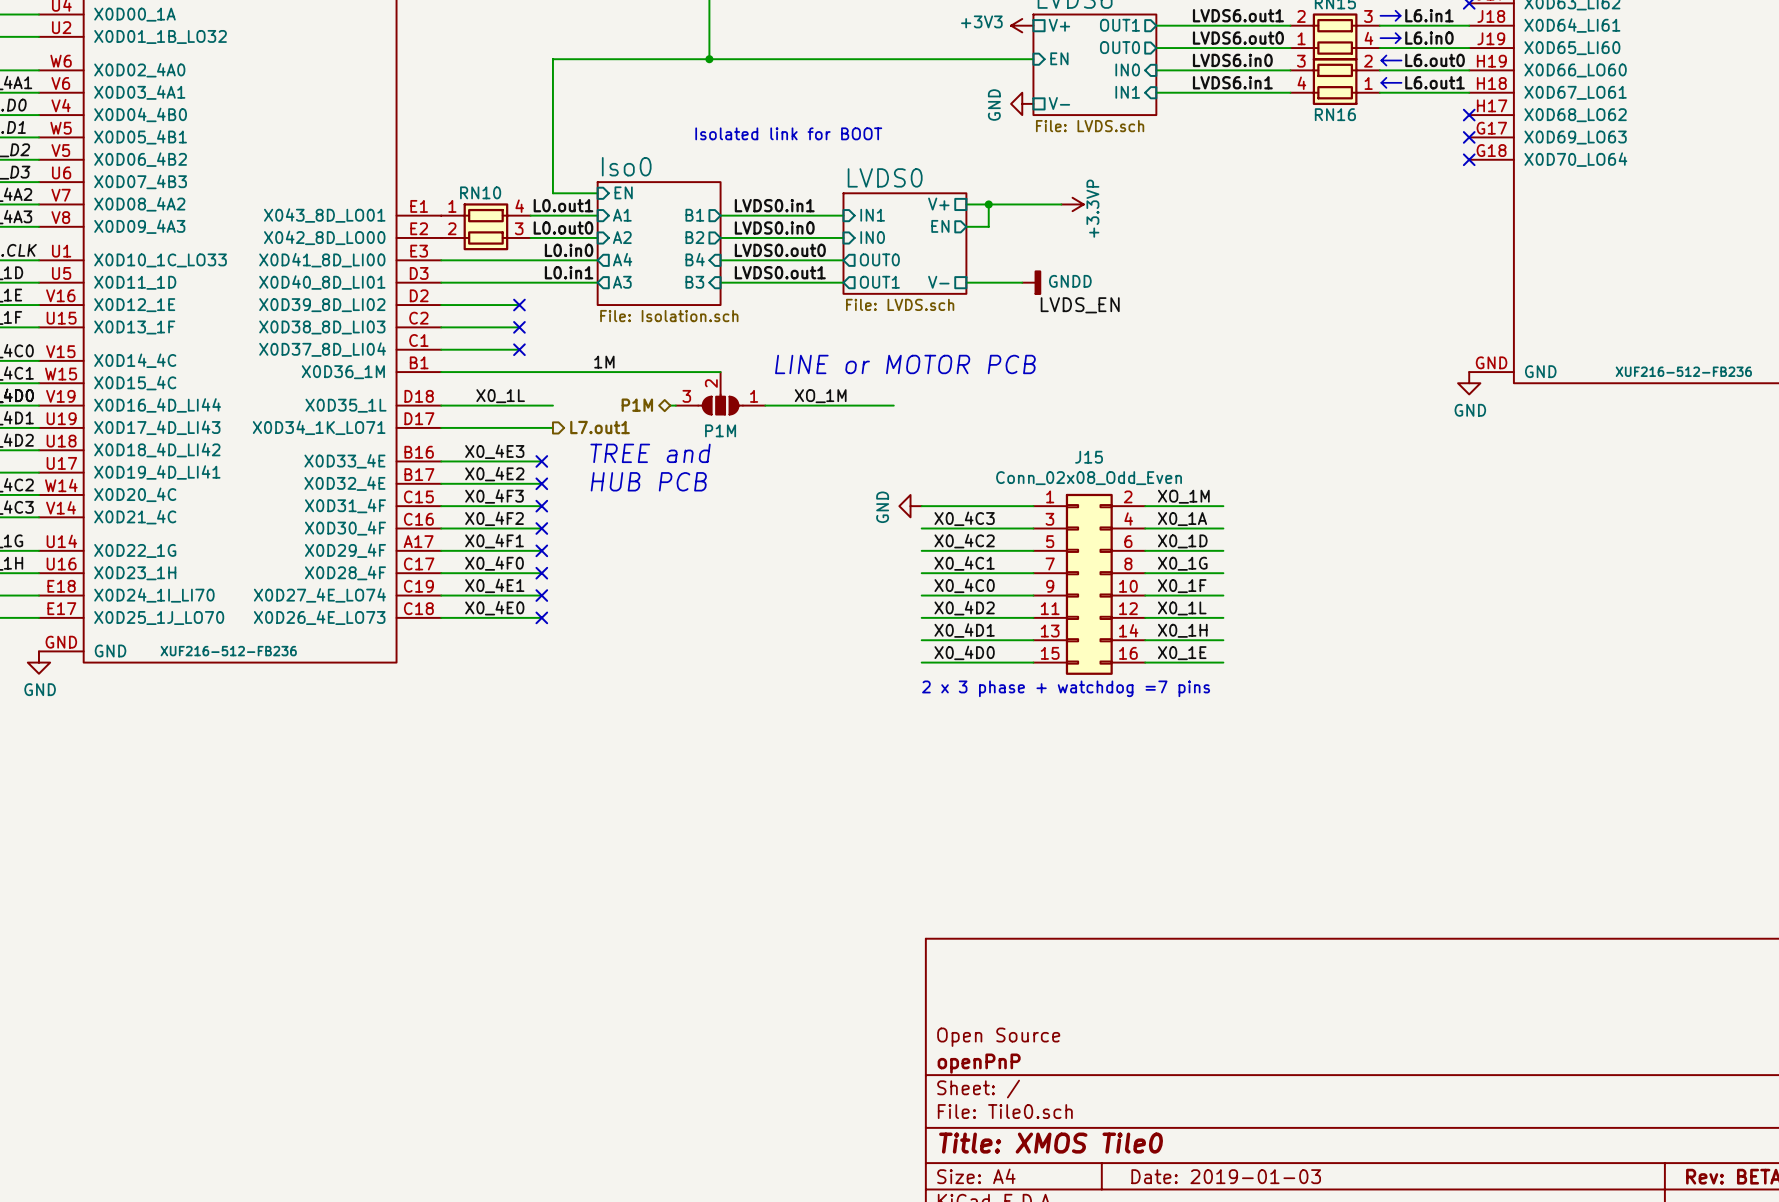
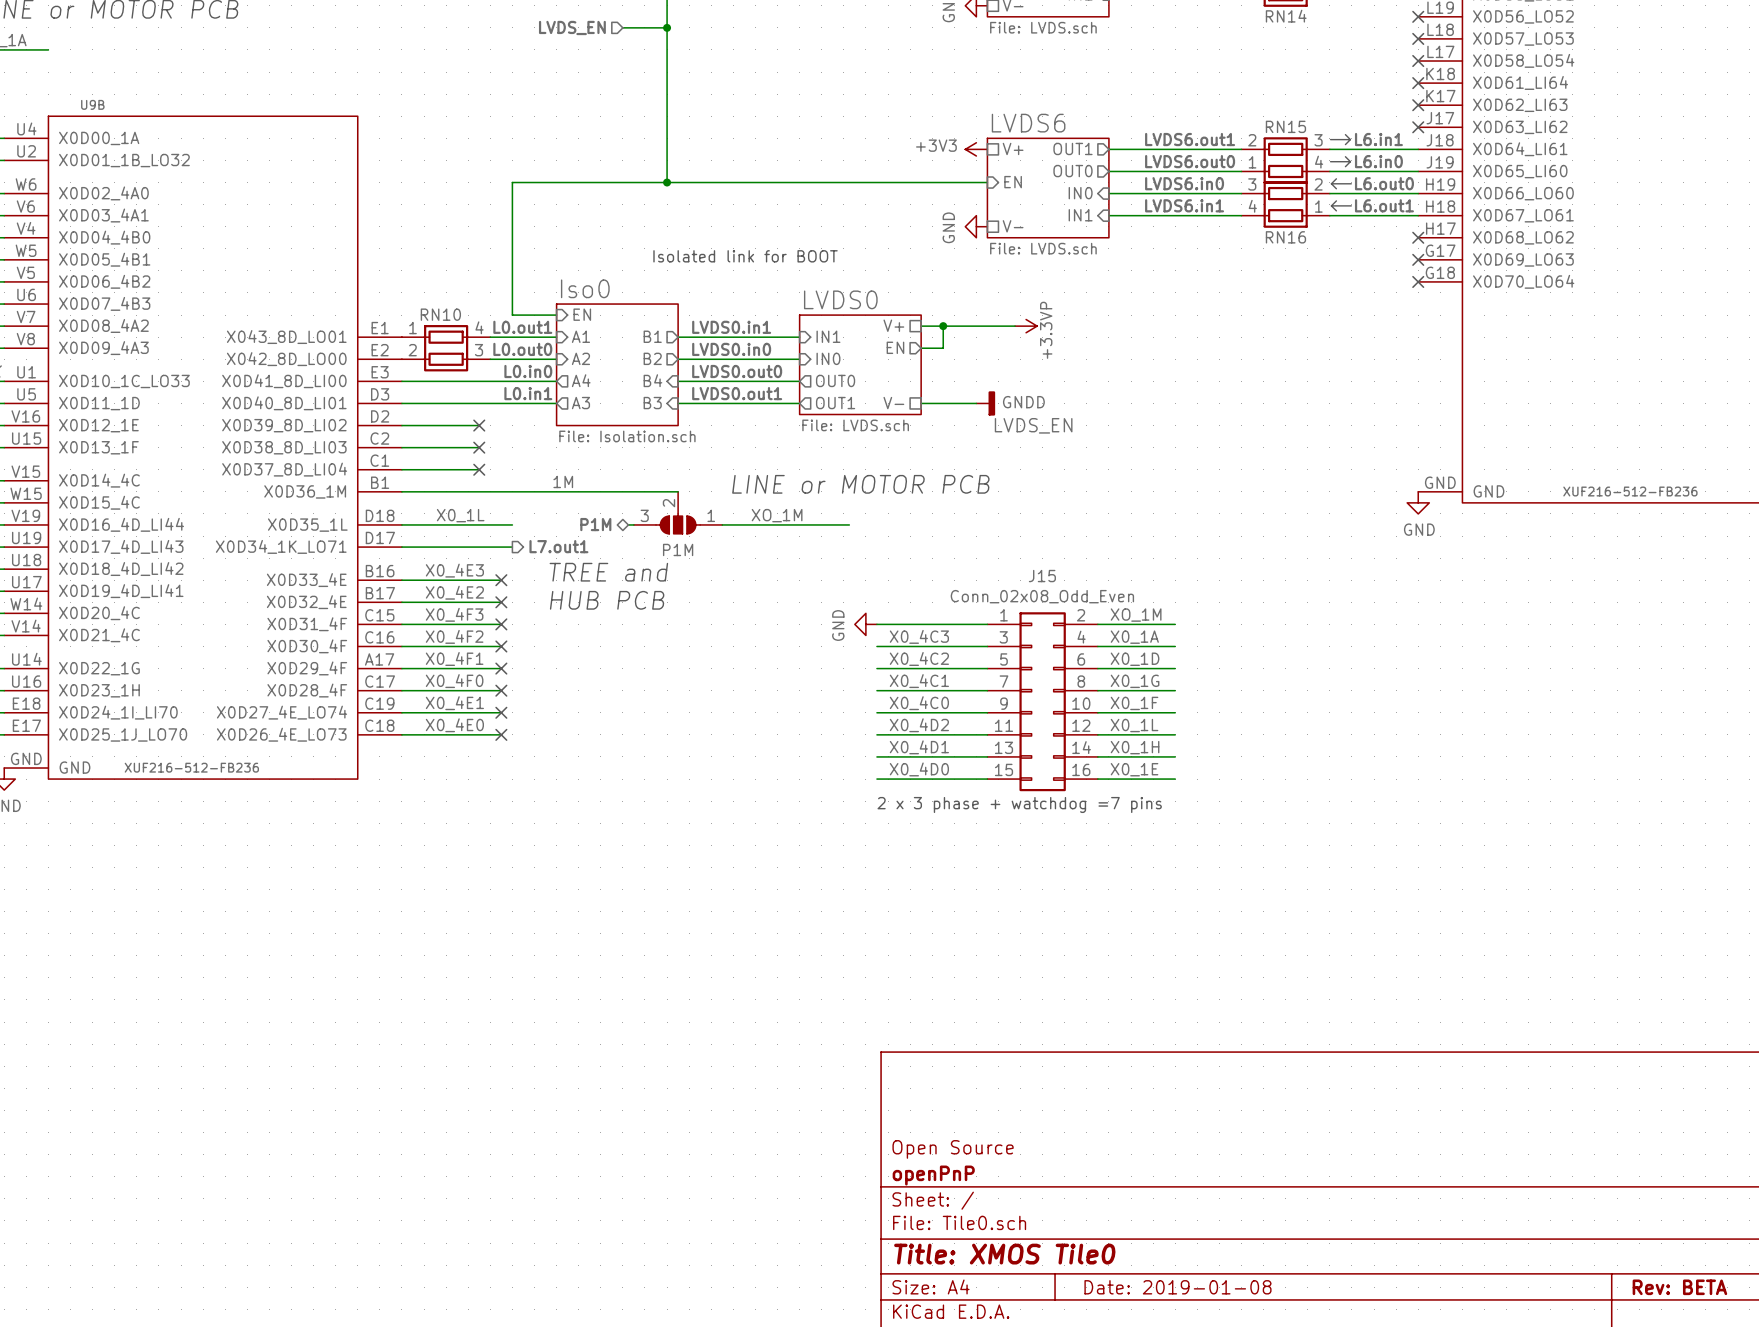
title block: Date: 2019-01-03 (1226, 1176) -> Date: 2019-01-08 (1177, 1287)

